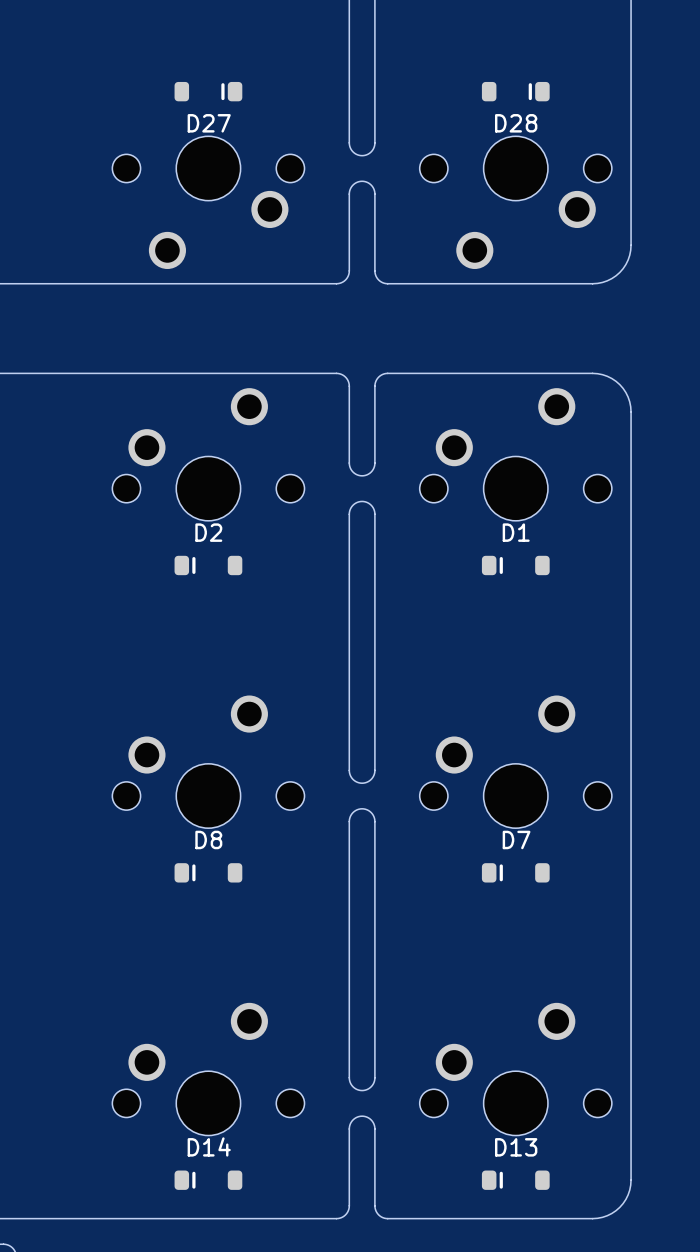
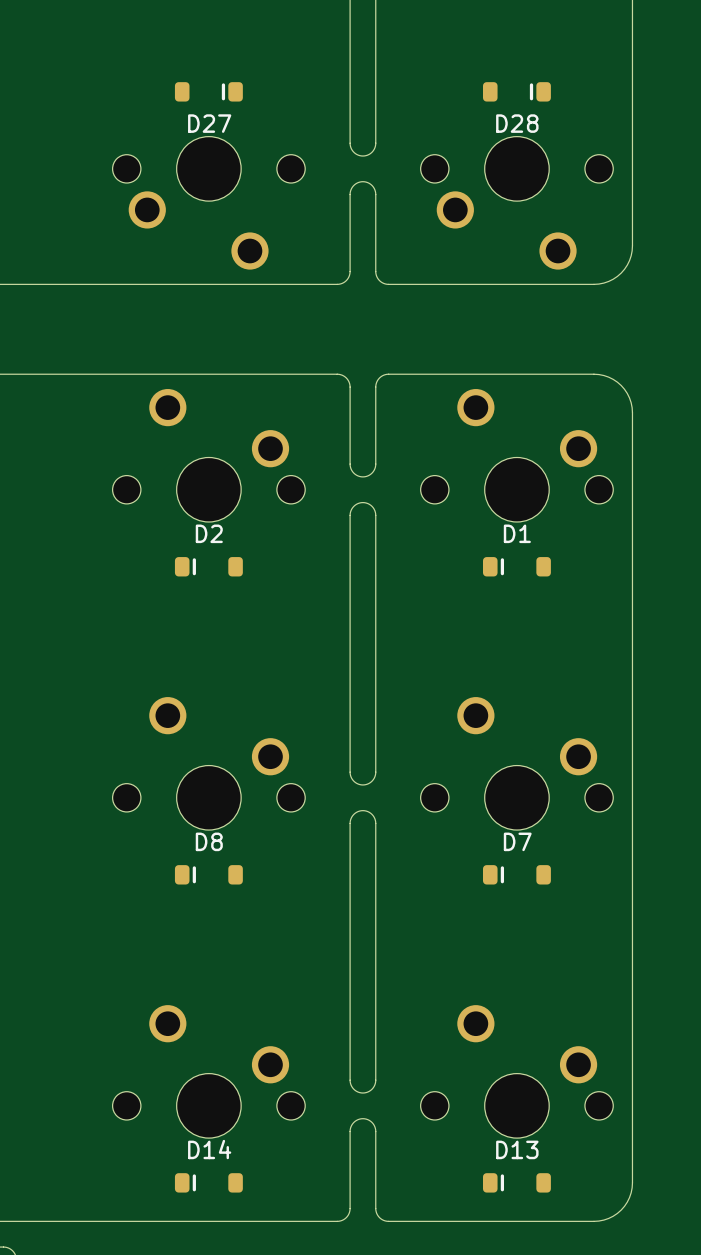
part side: bottom (208, 202) -> top (208, 203)
part side: bottom (515, 202) -> top (516, 203)
part side: bottom (208, 454) -> top (208, 455)
part side: bottom (515, 454) -> top (516, 455)
part side: bottom (208, 761) -> top (208, 763)
part side: bottom (515, 761) -> top (516, 763)
part side: bottom (208, 1069) -> top (208, 1071)
part side: bottom (515, 1069) -> top (516, 1071)

